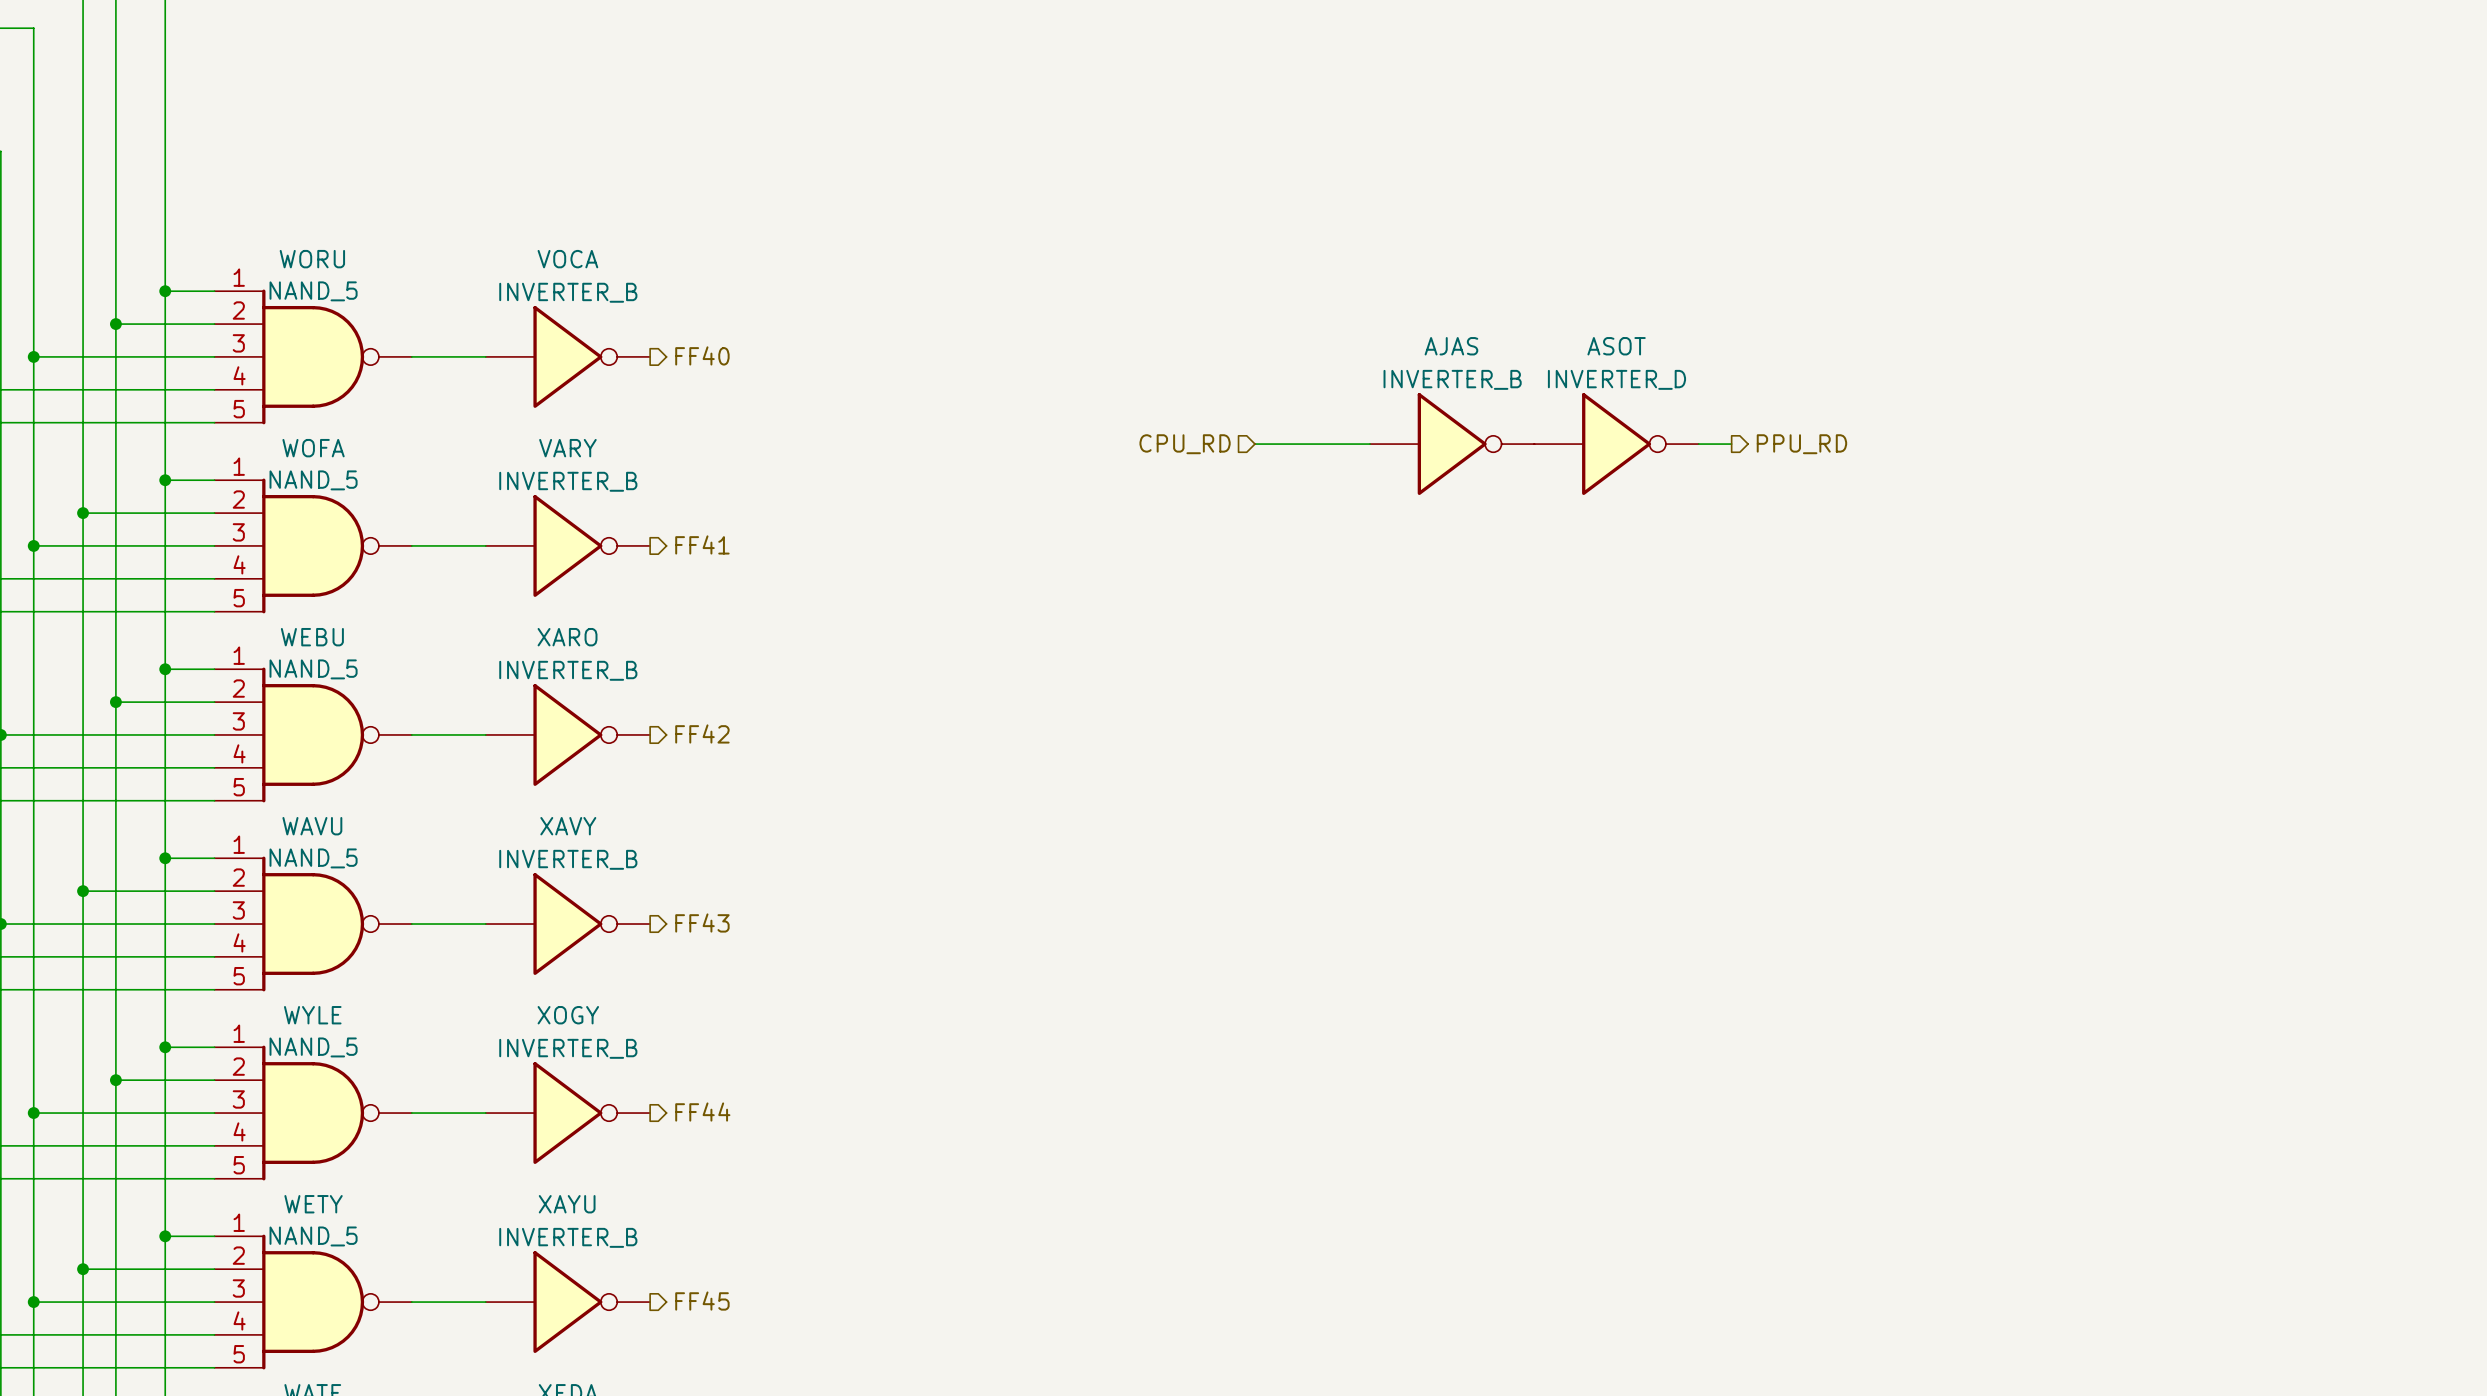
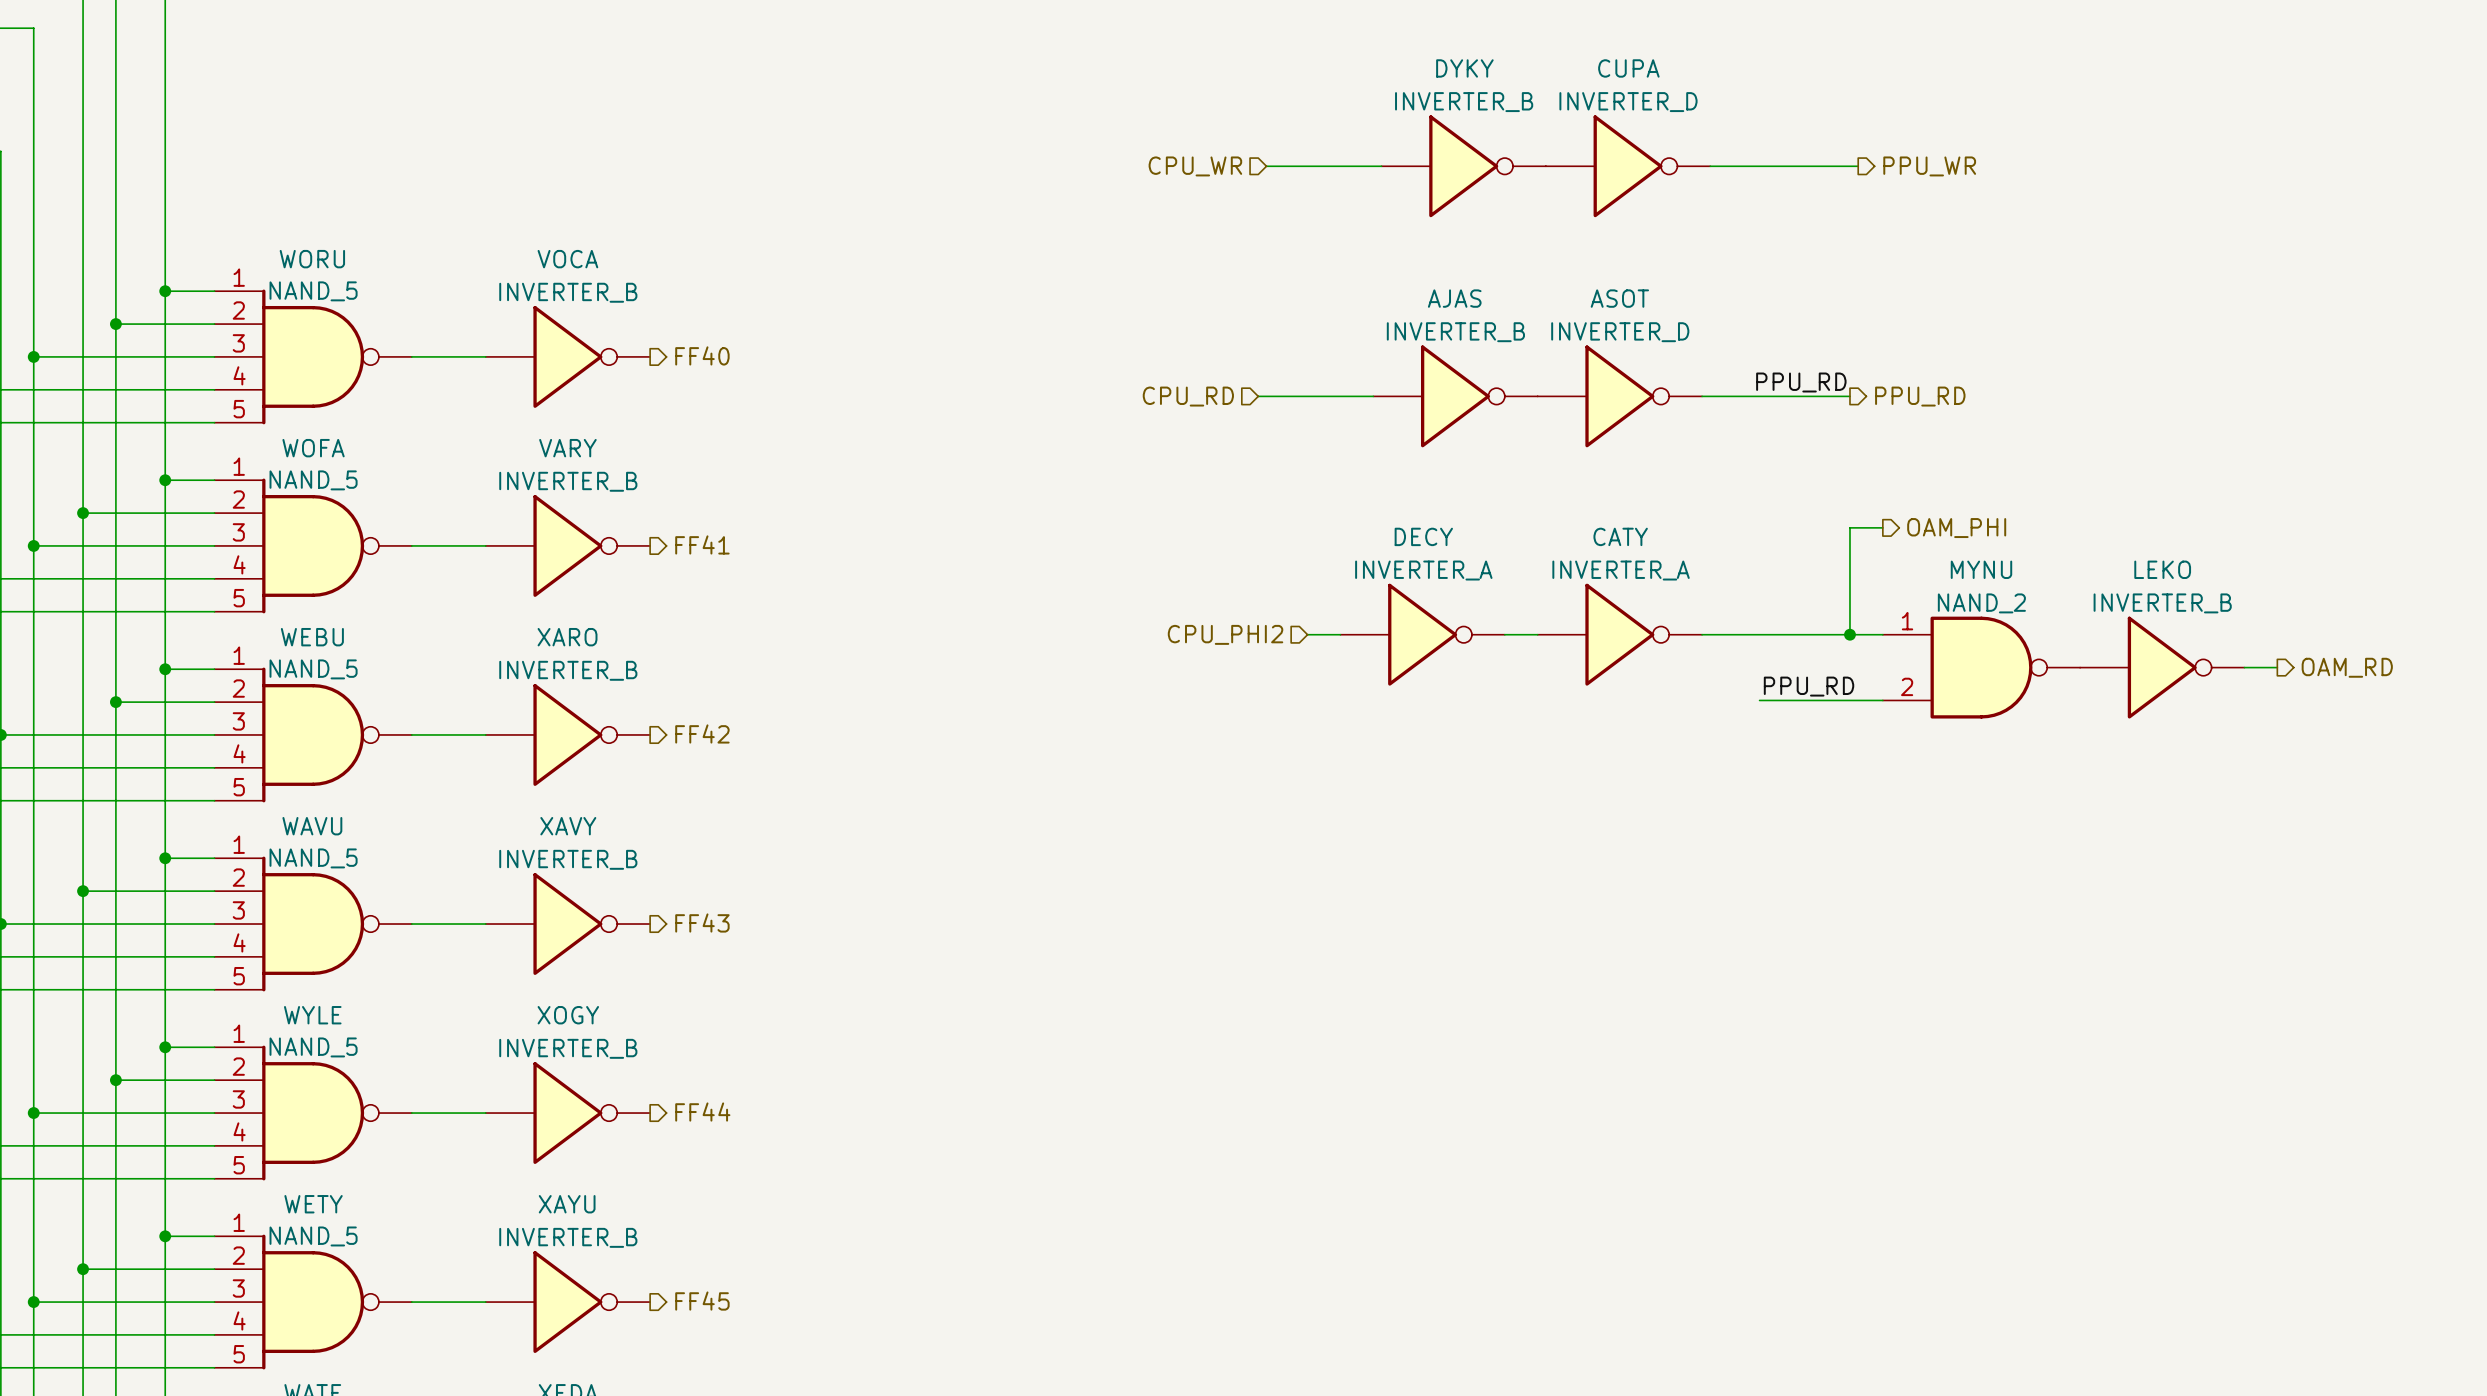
hierarchical label: none -> CPU_WR (1195, 166)
wire: none -> (1266, 166) (1381, 166)
DYKY: none -> INVERTER_B (1463, 166)
CUPA: none -> INVERTER_D (1628, 166)
wire: none -> (1710, 166) (1858, 166)
hierarchical label: none -> PPU_WR (1929, 166)
label: none -> PPU_RD (1801, 382)
wire: none -> (1702, 396) (1849, 396)
hierarchical label position: CPU_RD (1185, 444) -> CPU_RD (1188, 396)
wire: (1254, 444) (1370, 444) -> (1258, 396) (1373, 396)
AJAS position: (1452, 444) -> (1455, 396)
ASOT position: (1616, 444) -> (1619, 396)
wire: (1698, 444) (1731, 444) -> (1504, 634) (1537, 634)
hierarchical label position: PPU_RD (1801, 444) -> PPU_RD (1920, 396)
wire: none -> (1882, 527) (1849, 527) (1849, 634)
hierarchical label: none -> OAM_PHI (1956, 528)
hierarchical label: none -> CPU_PHI2 (1225, 634)
wire: none -> (1307, 634) (1340, 634)
DECY: none -> INVERTER_A (1422, 634)
CATY: none -> INVERTER_A (1619, 634)
wire: none -> (1702, 634) (1882, 634)
junction: none -> (1849, 634)
MYNU: none -> NAND_2 (1981, 667)
LEKO: none -> INVERTER_B (2162, 667)
wire: none -> (2244, 667) (2277, 667)
hierarchical label: none -> OAM_RD (2347, 667)
label: none -> PPU_RD (1809, 686)
wire: none -> (1759, 700) (1882, 700)

